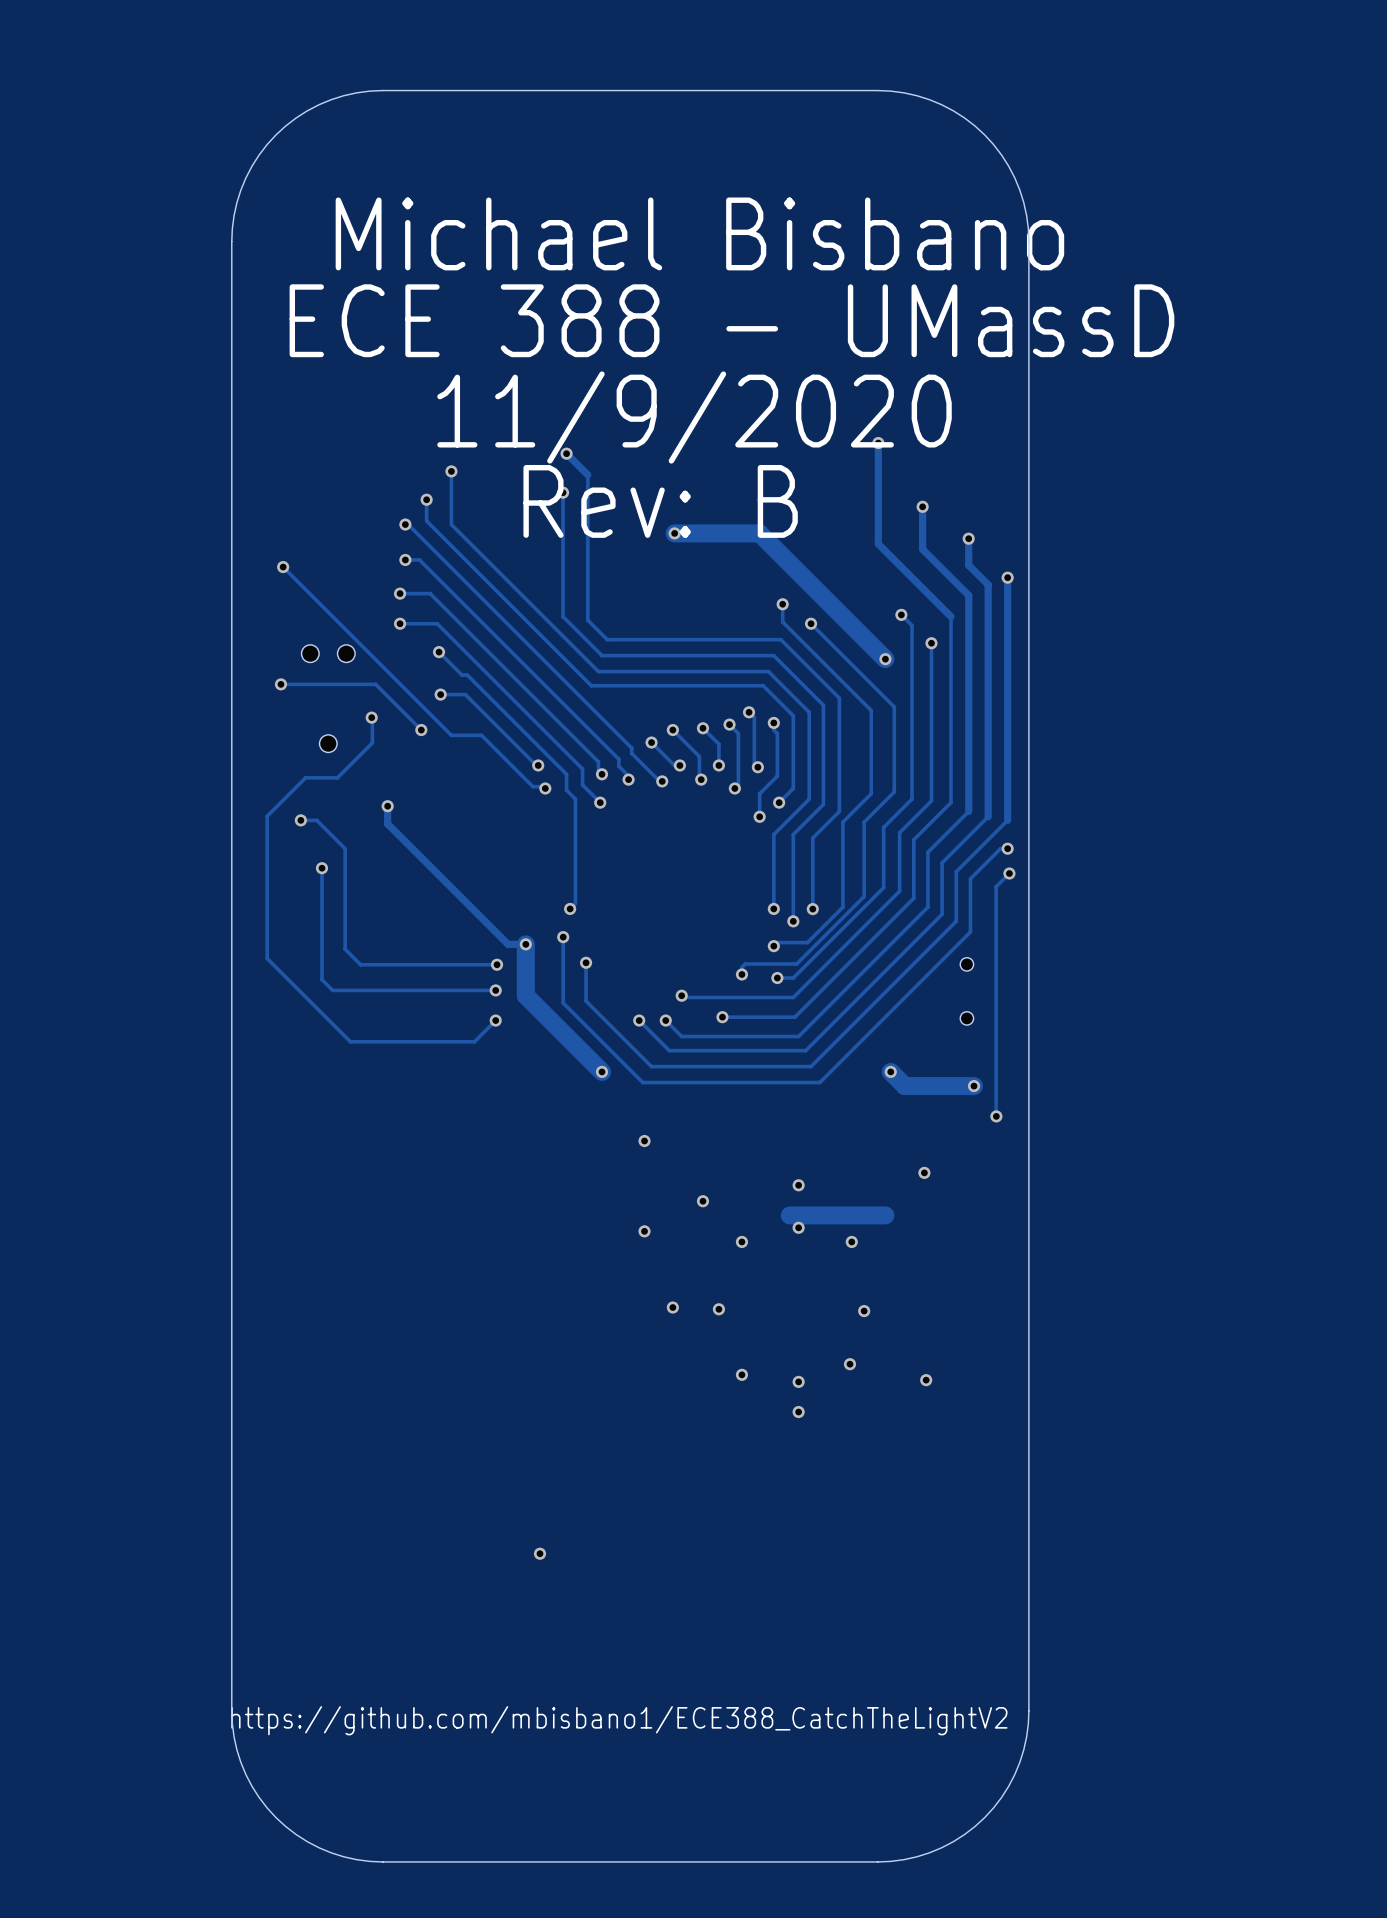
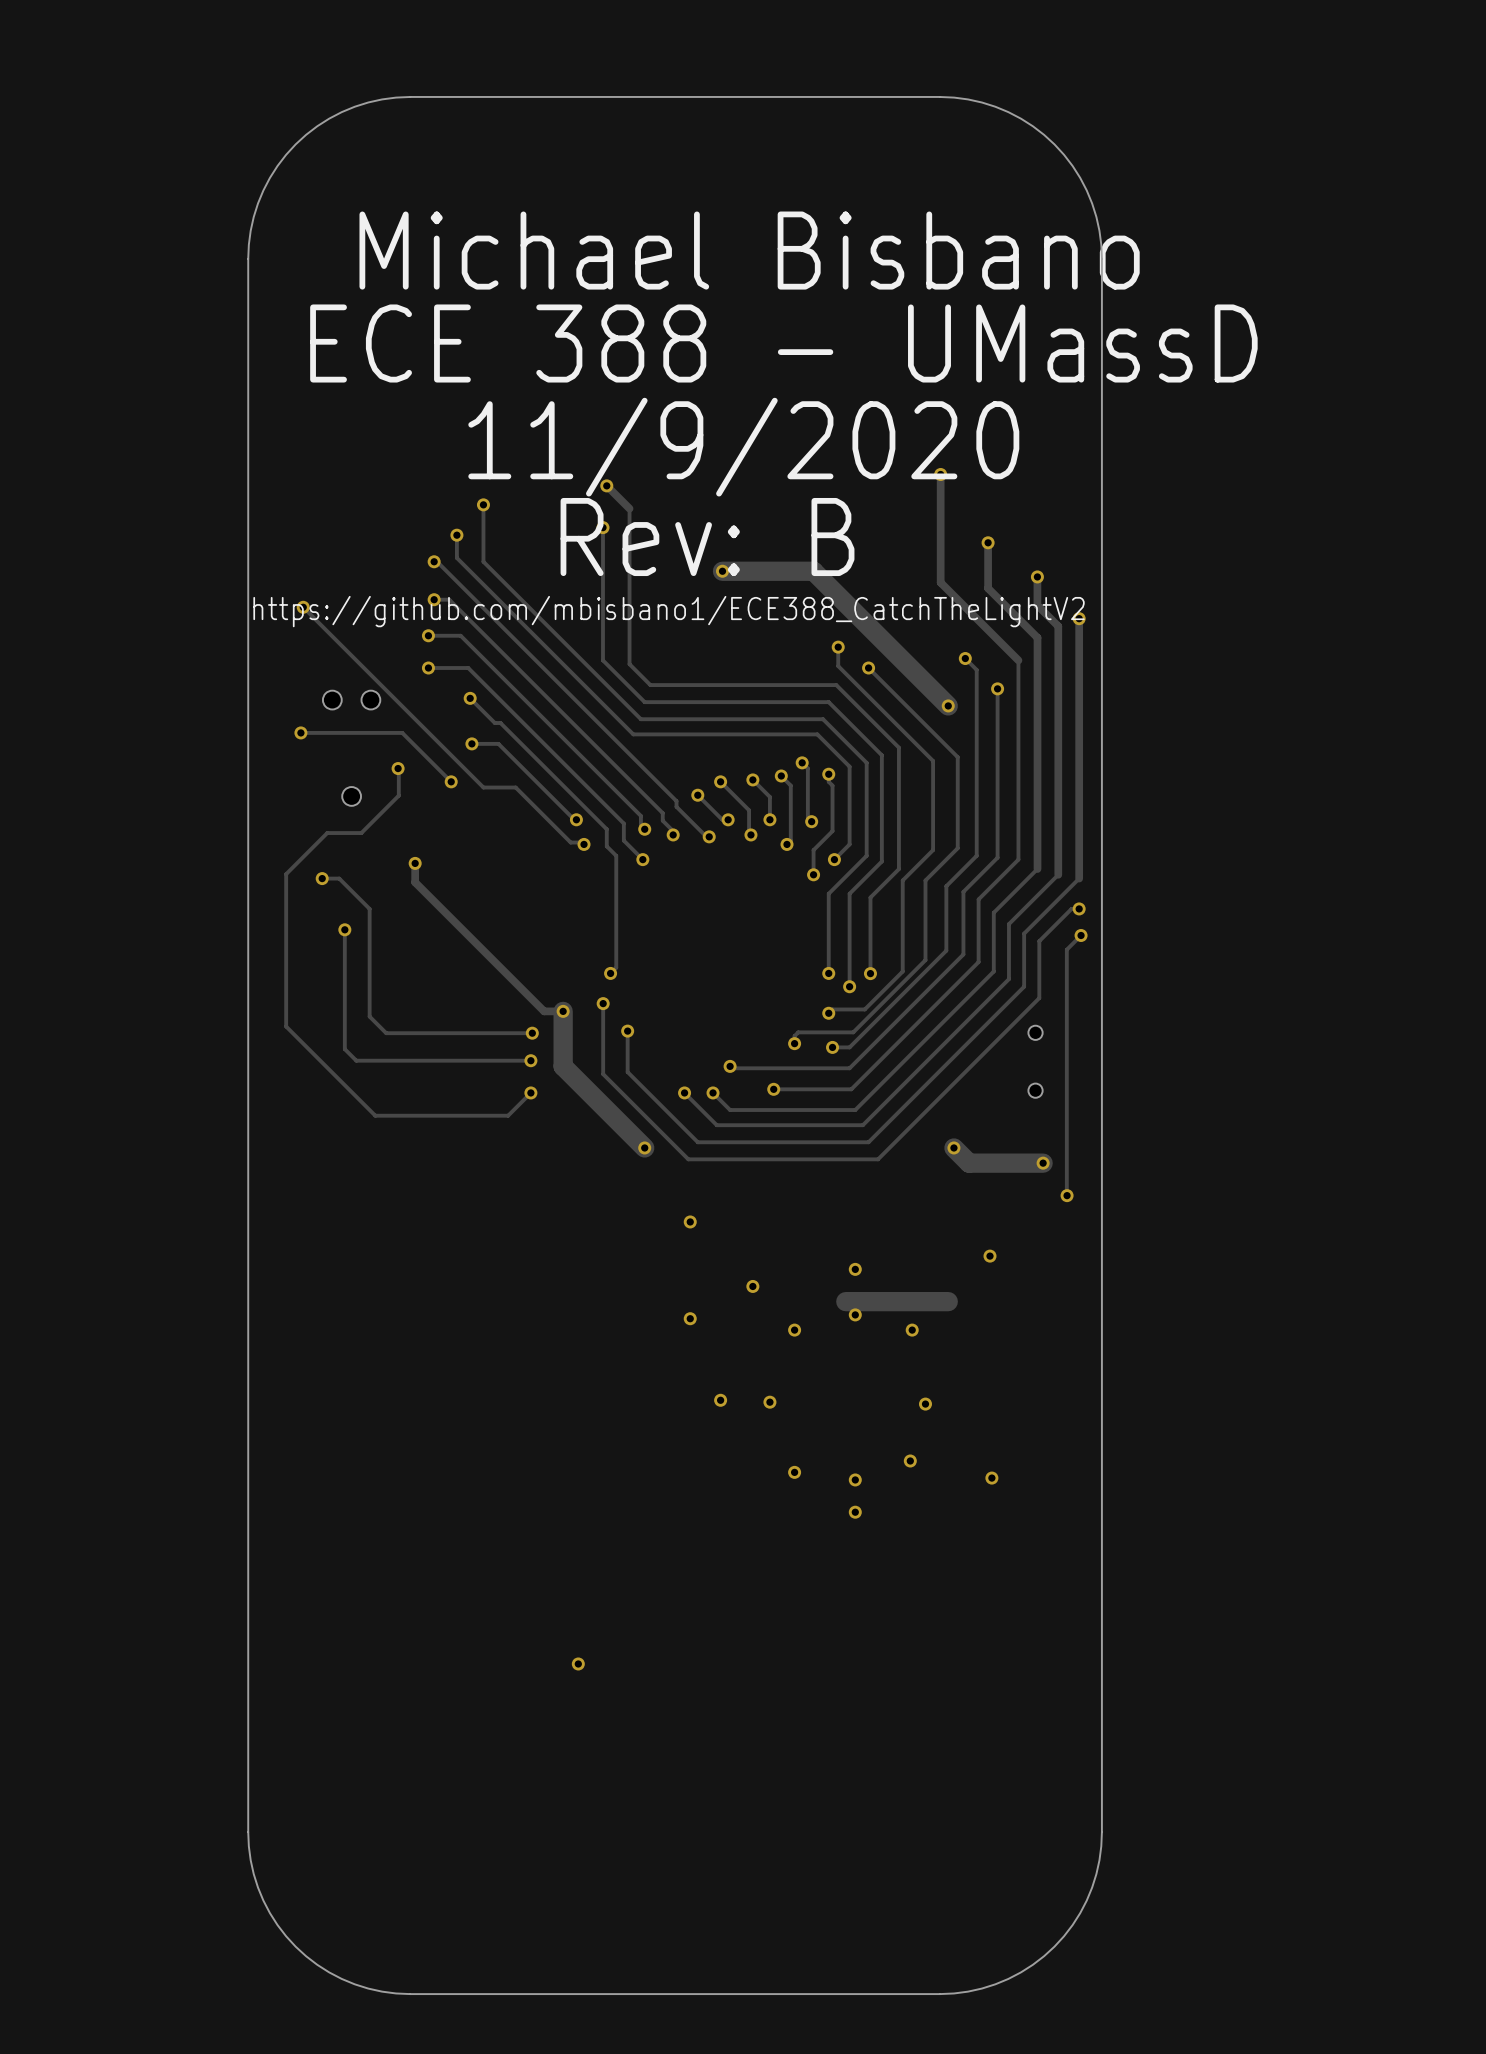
text: none -> https://github.com/mbisbano1/ECE388_CatchTheLightV2 (669, 611)
text: https://github.com/mbisbano1/ECE388_CatchTheLightV2 (619, 1720) -> none

